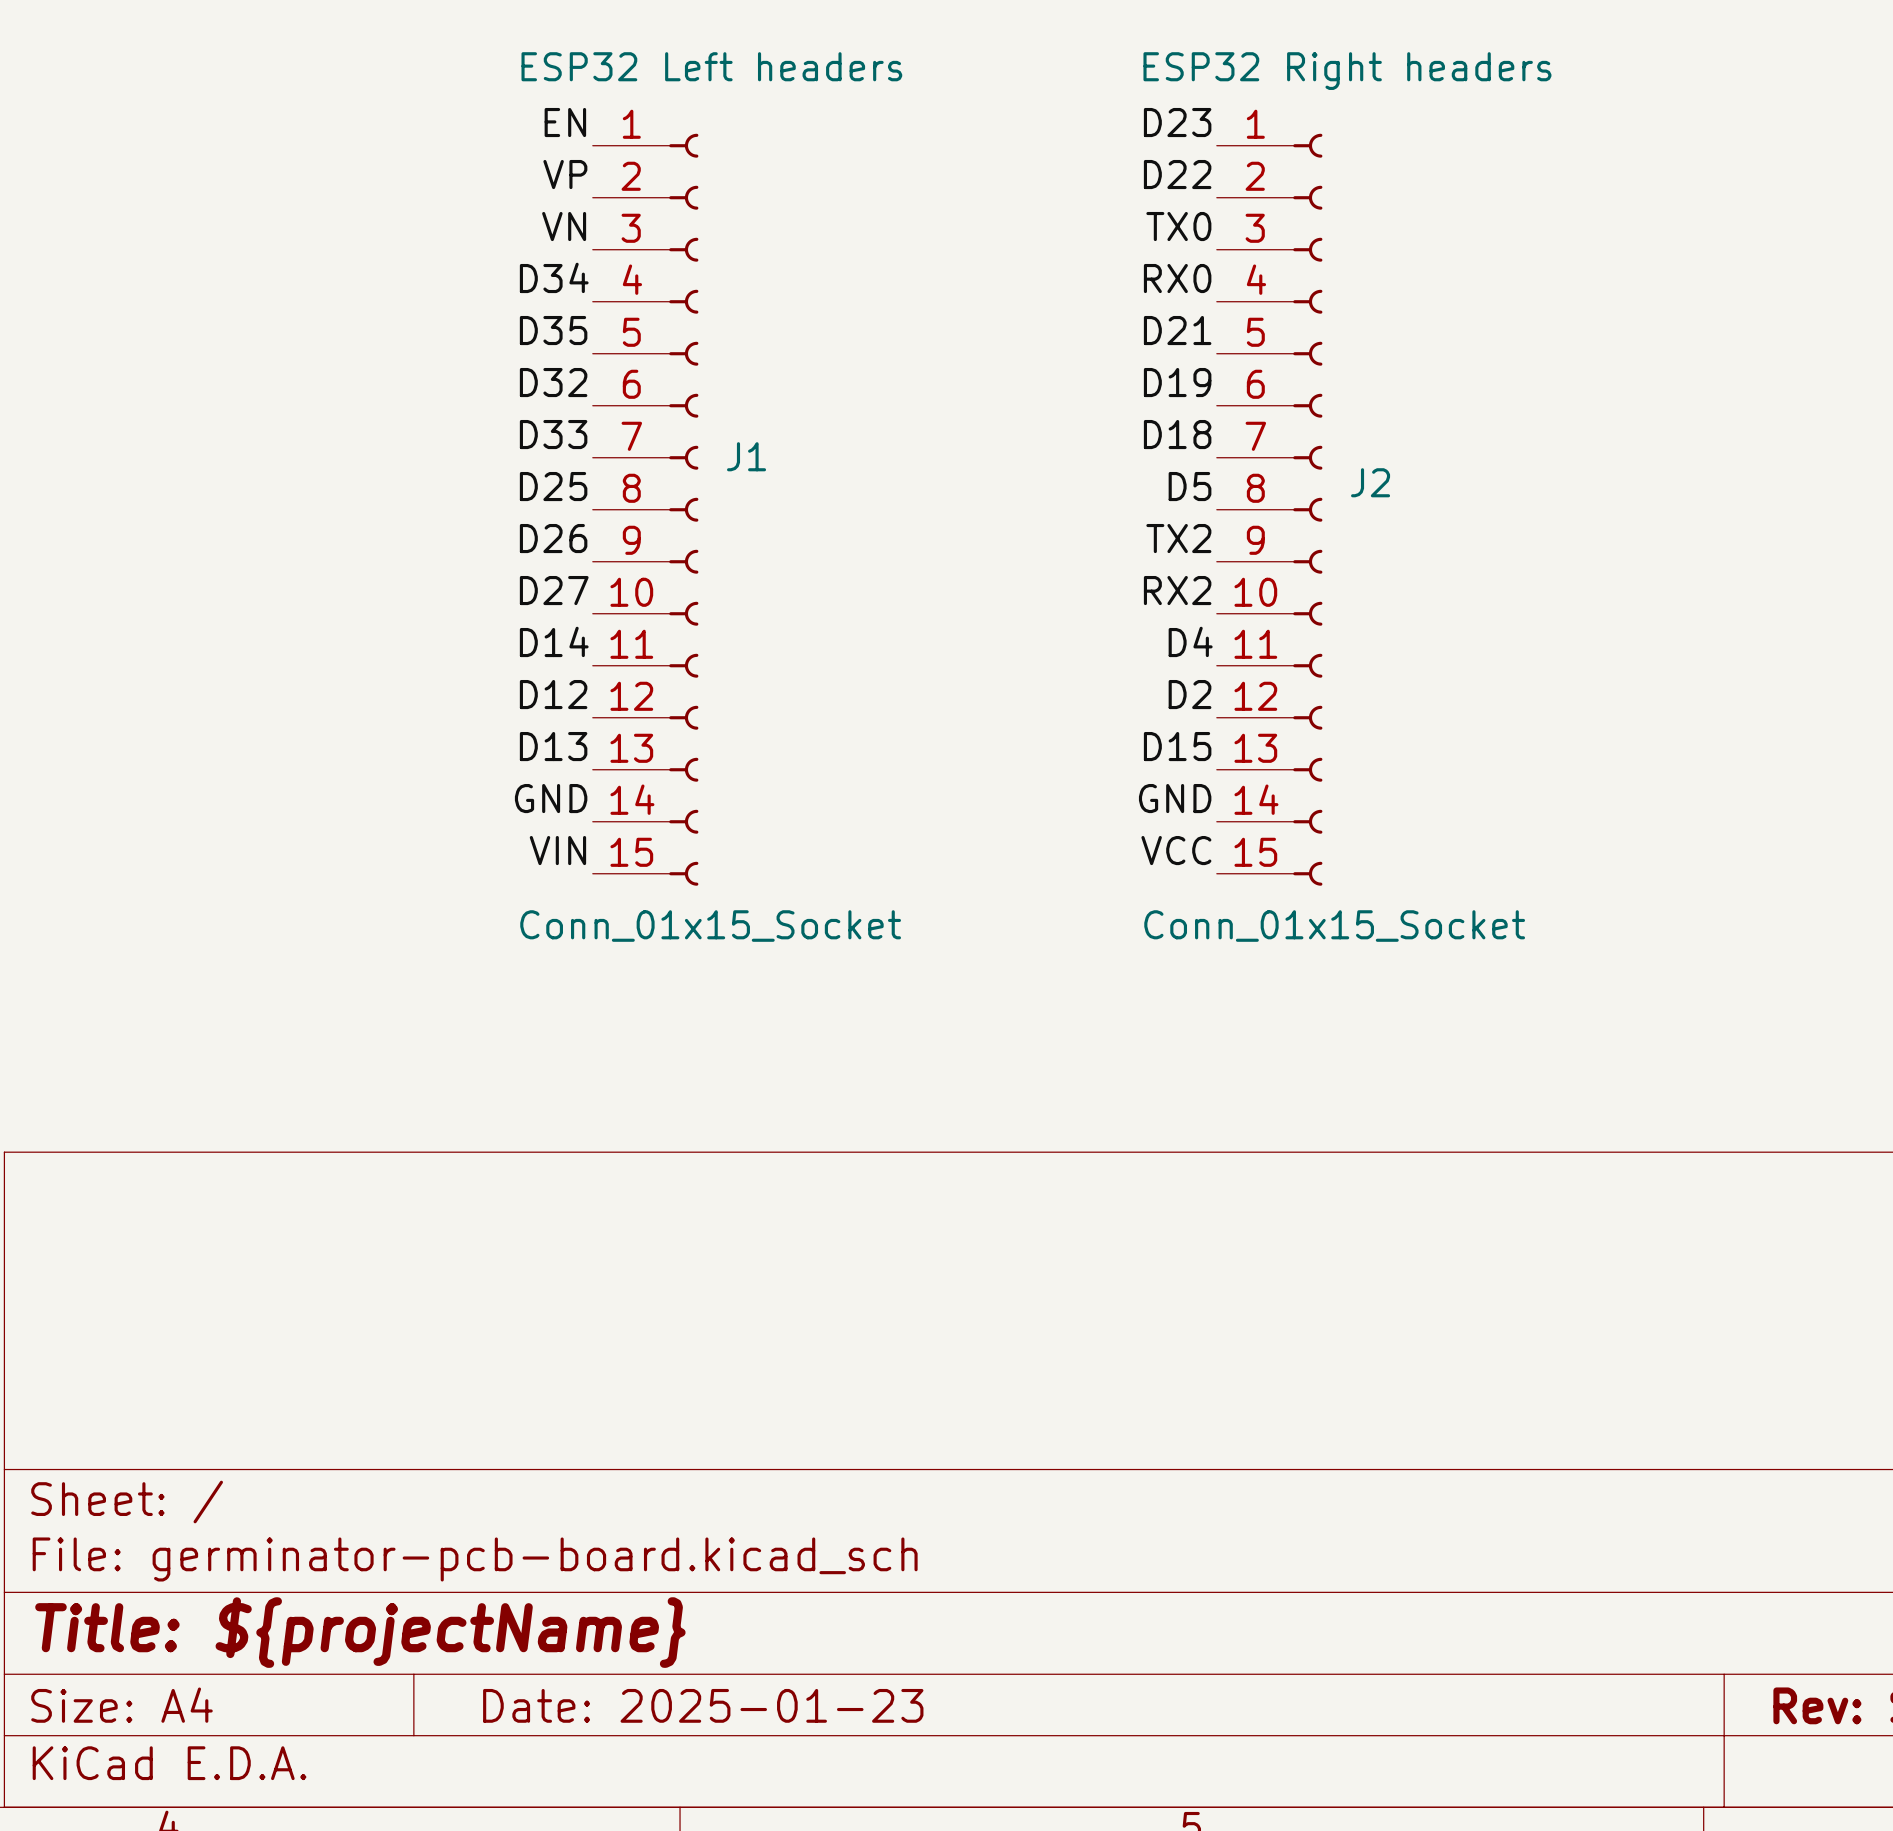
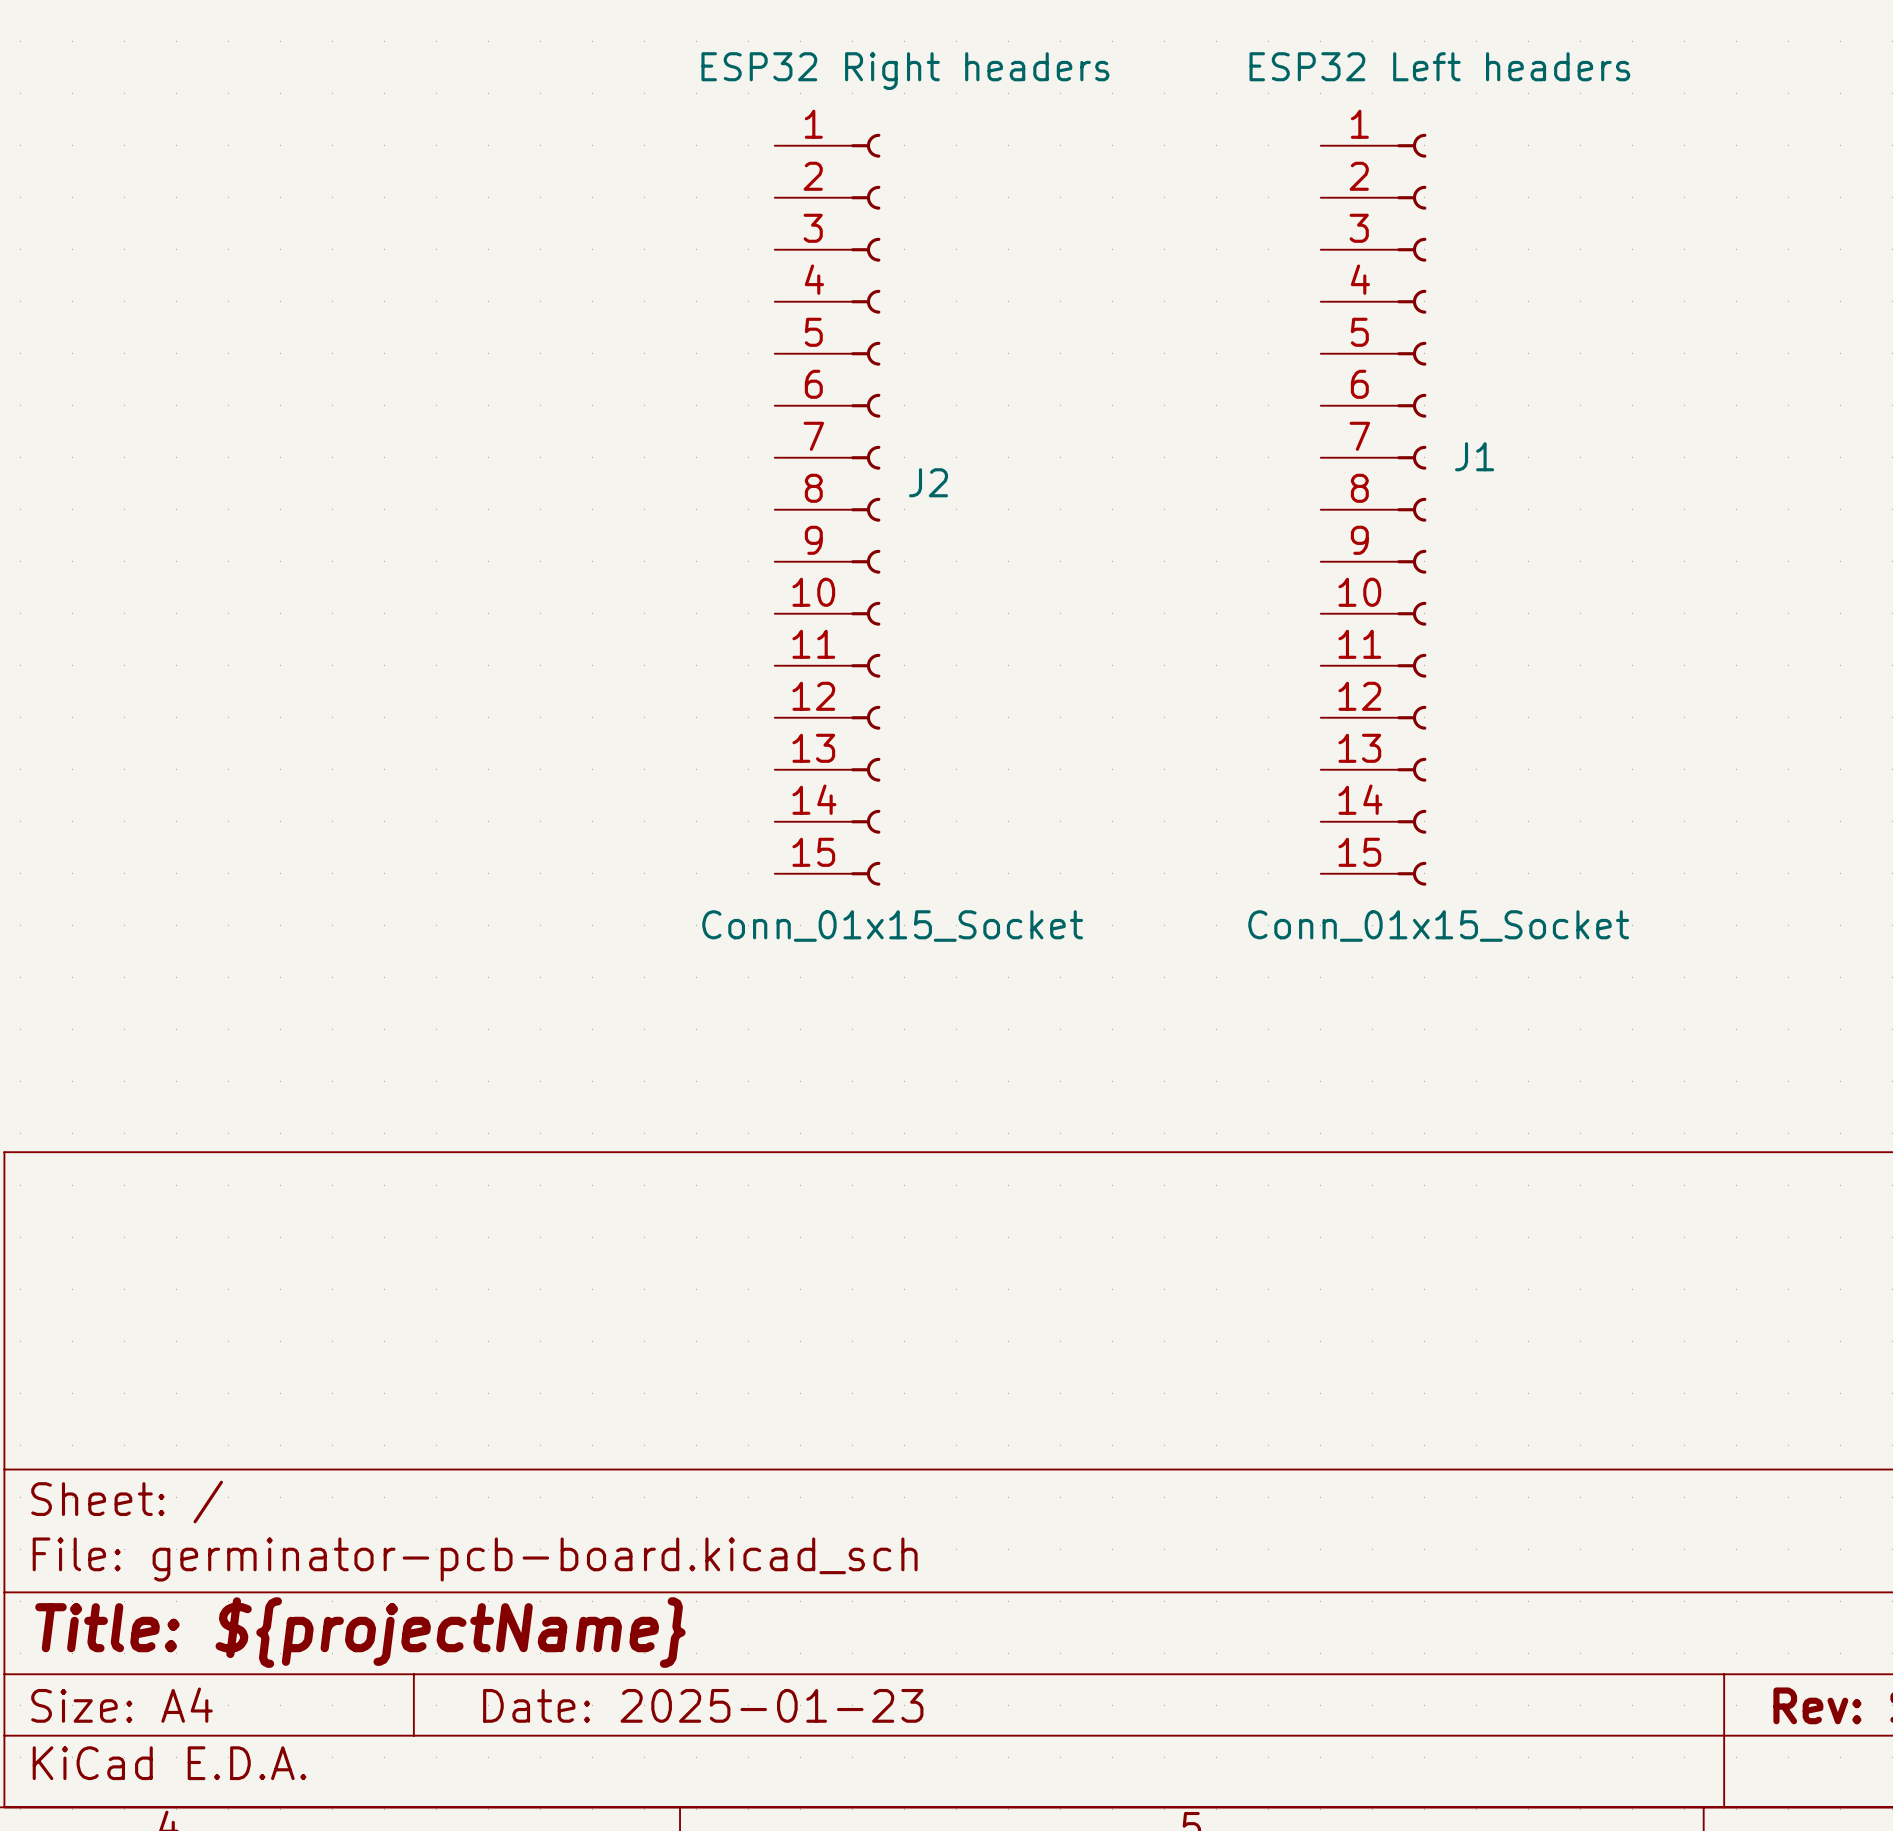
label: EN (565, 122) -> none
label: D23 (1177, 122) -> none
label: VP (565, 174) -> none
label: D22 (1177, 174) -> none
label: VN (564, 226) -> none
label: TX0 (1178, 226) -> none
label: D34 (554, 277) -> none
label: RX0 (1177, 278) -> none
label: D35 (553, 330) -> none
label: D21 (1177, 330) -> none
label: D32 (553, 382) -> none
label: D19 (1177, 382) -> none
label: D33 (553, 434) -> none
label: D18 (1177, 434) -> none
label: D25 (553, 486) -> none
label: D5 (1190, 486) -> none
J1 position: (645, 509) -> (1373, 509)
J2 position: (1269, 509) -> (827, 509)
label: D26 (553, 538) -> none
label: TX2 (1178, 538) -> none
label: D27 (554, 590) -> none
label: RX2 (1177, 590) -> none
label: D14 (554, 641) -> none
label: D4 (1190, 641) -> none
label: D12 (553, 694) -> none
label: D2 (1190, 694) -> none
label: D13 (553, 746) -> none
label: D15 (1177, 746) -> none
label: GND (551, 798) -> none
label: GND (1175, 798) -> none
label: VIN (557, 850) -> none
label: VCC (1176, 850) -> none

